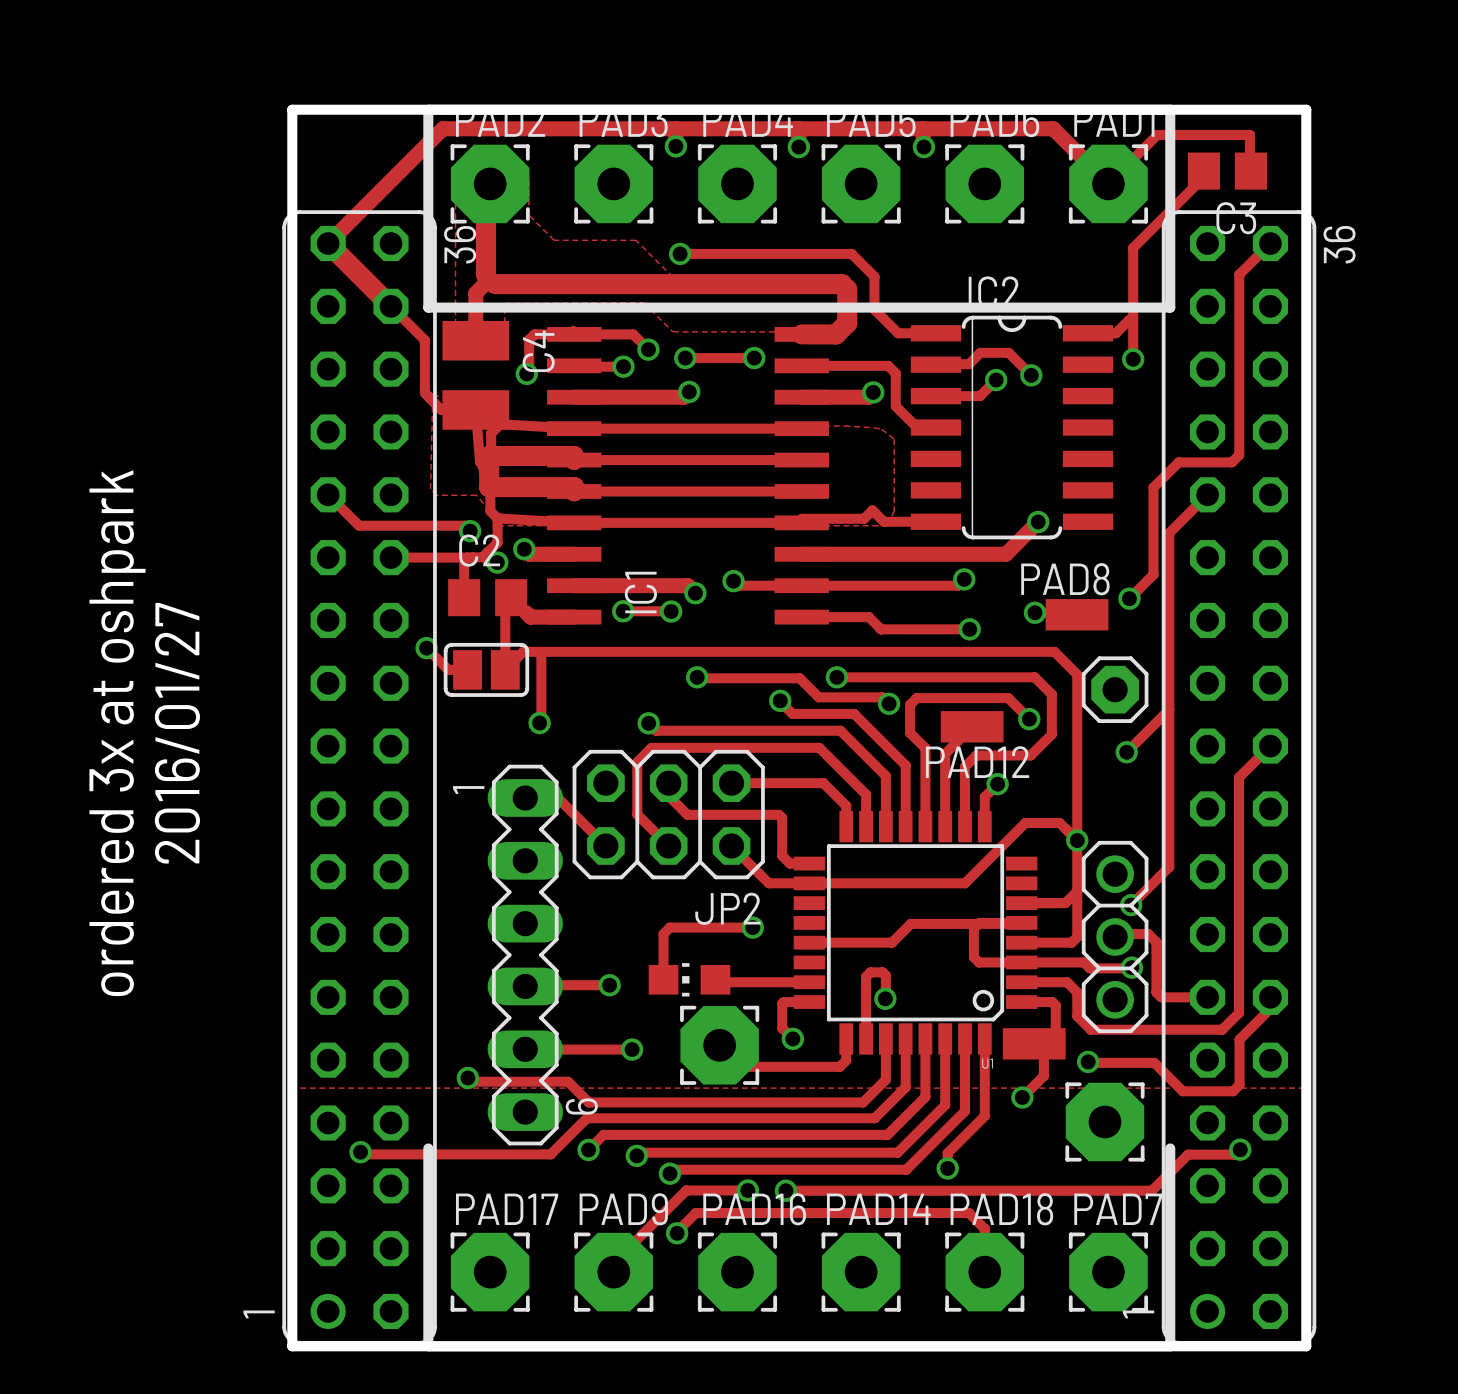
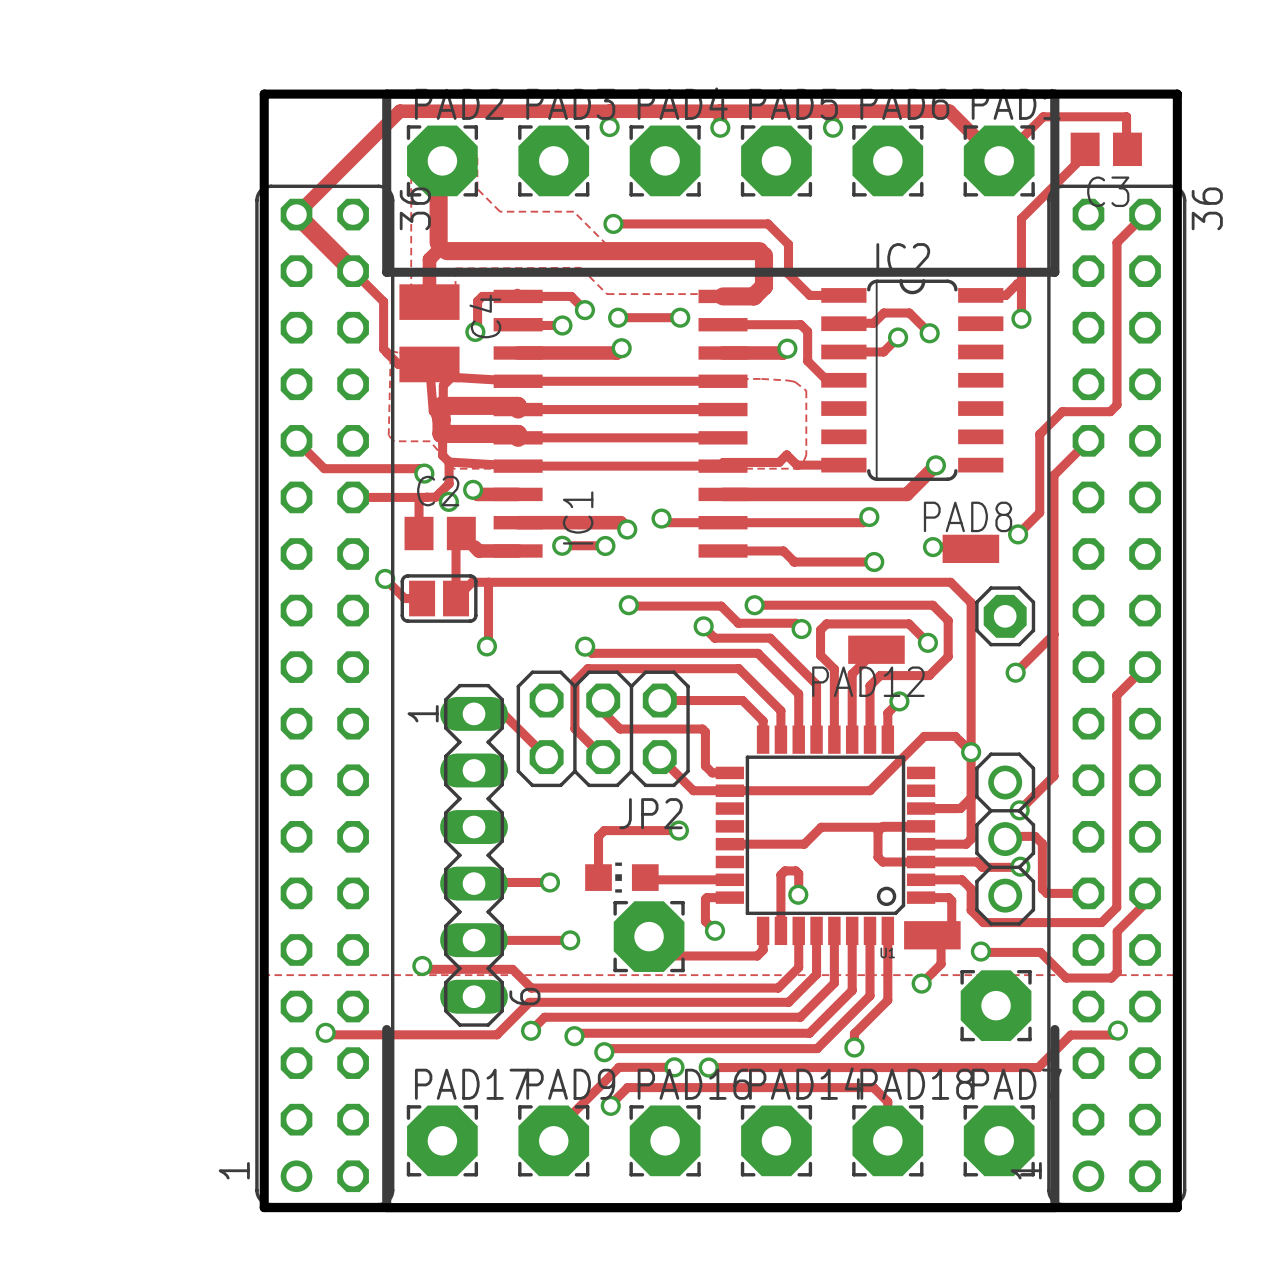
text: ordered 3x at oshpark (117, 733) -> none
text: 2016/01/27 (177, 733) -> none

